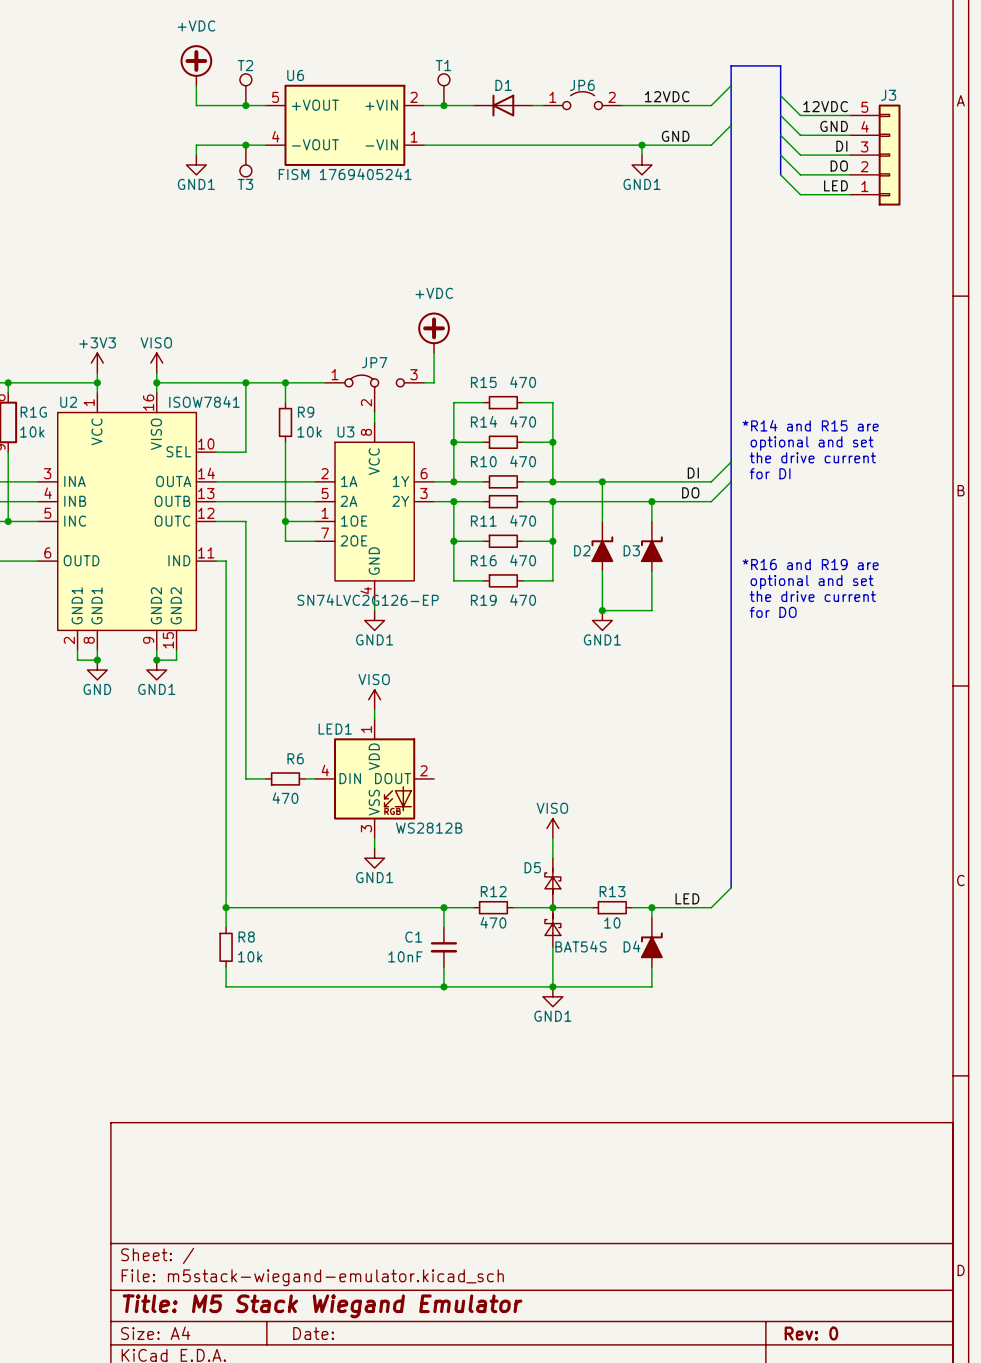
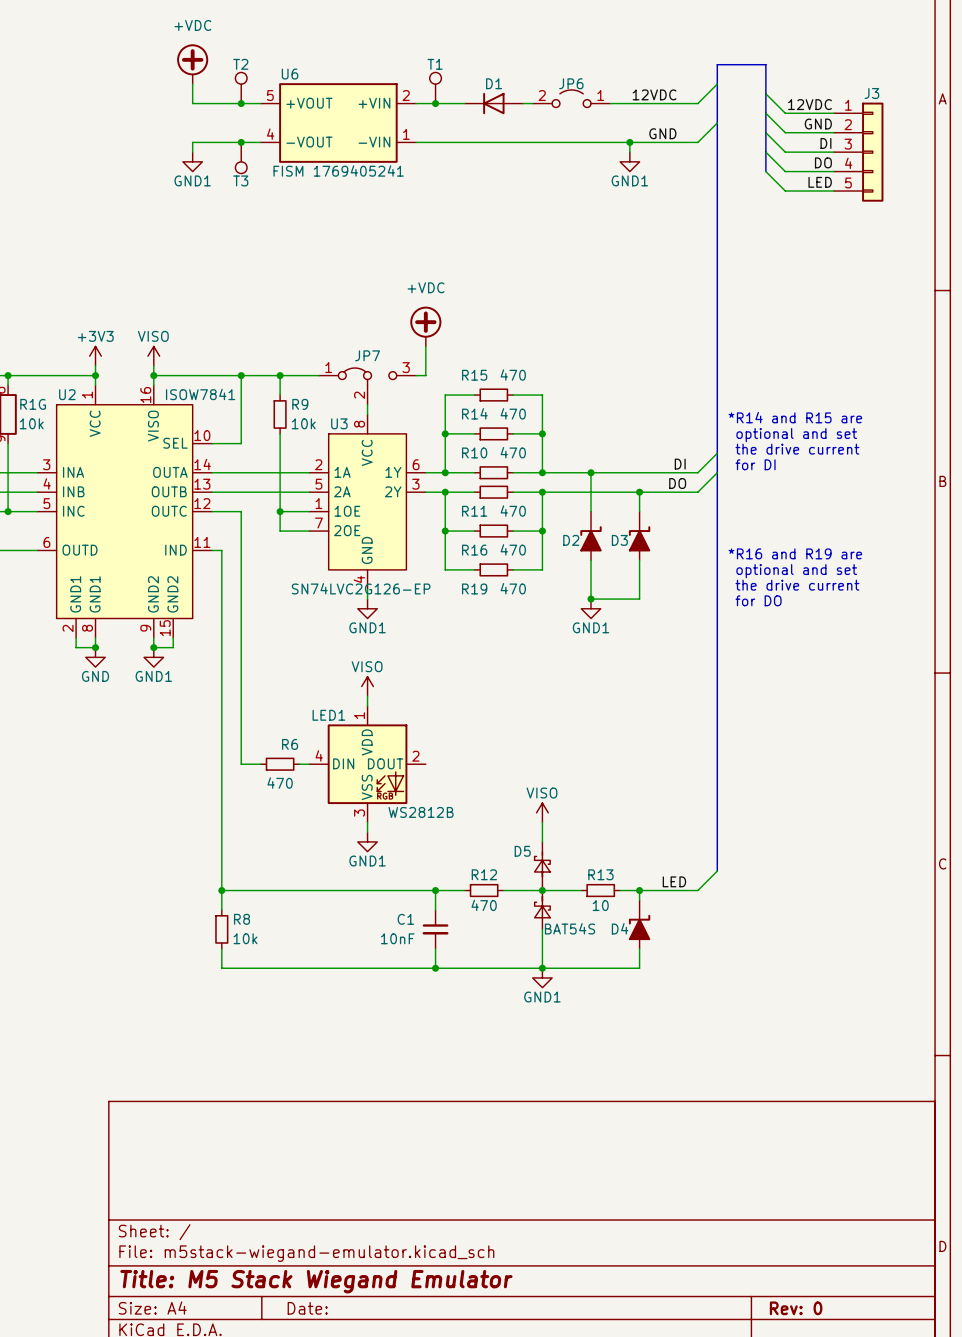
JP6 flip: as is (582, 100) -> left-right (571, 98)
J3 flip: as is (889, 155) -> up-down (872, 152)

